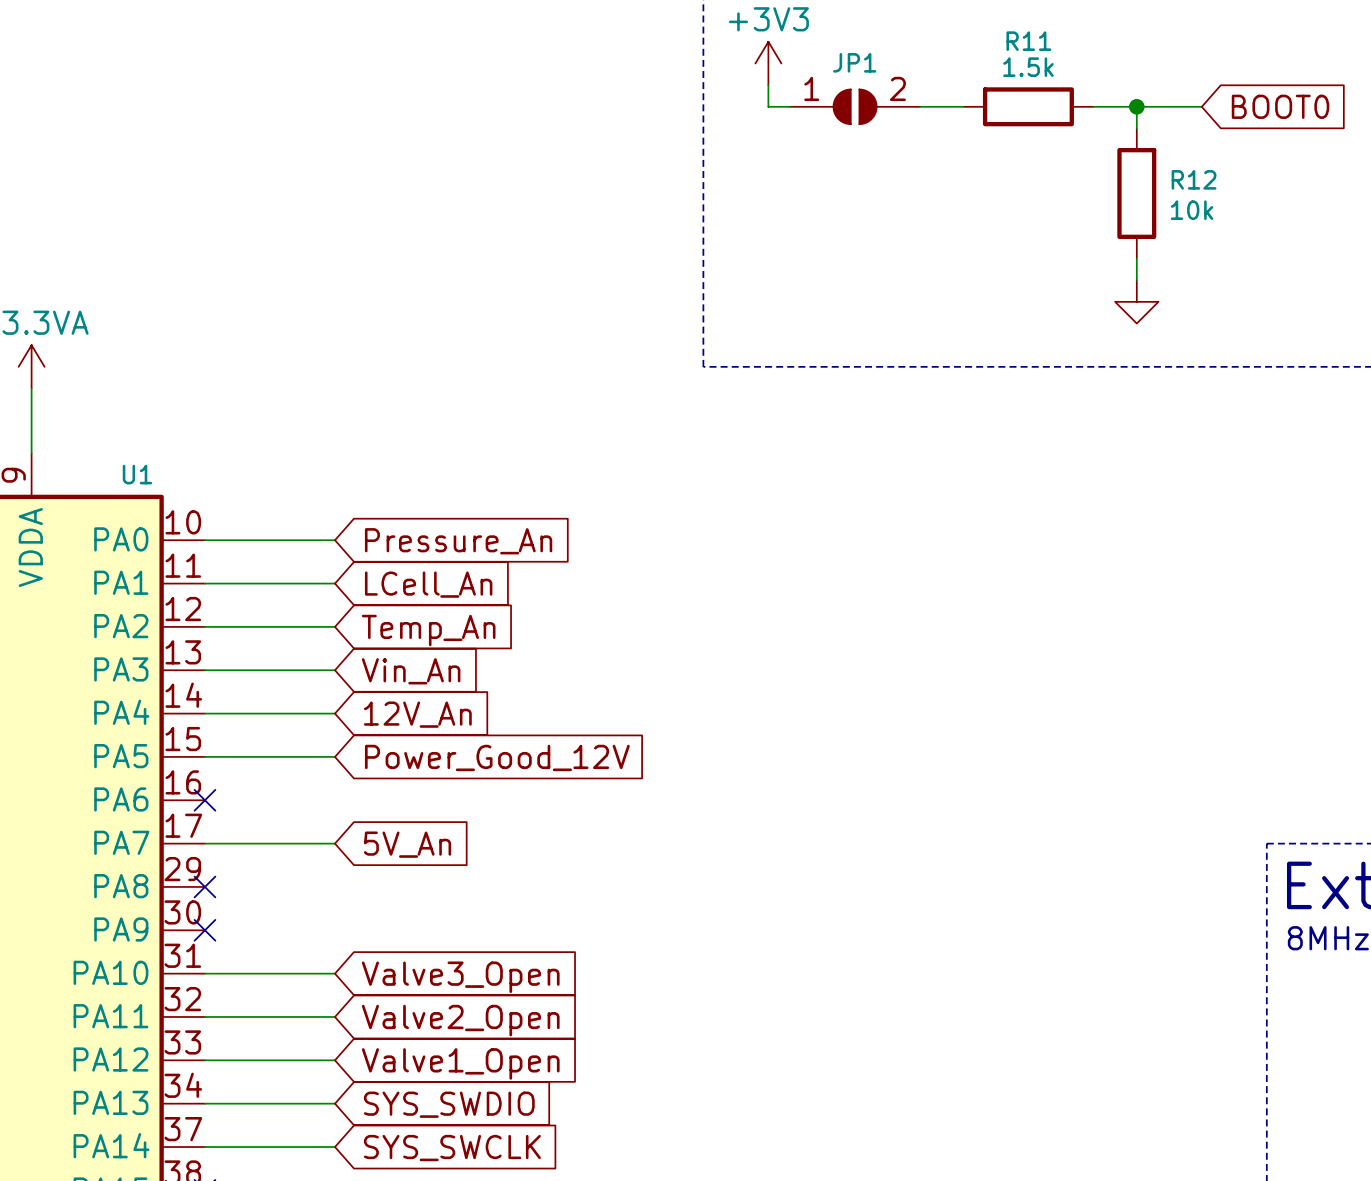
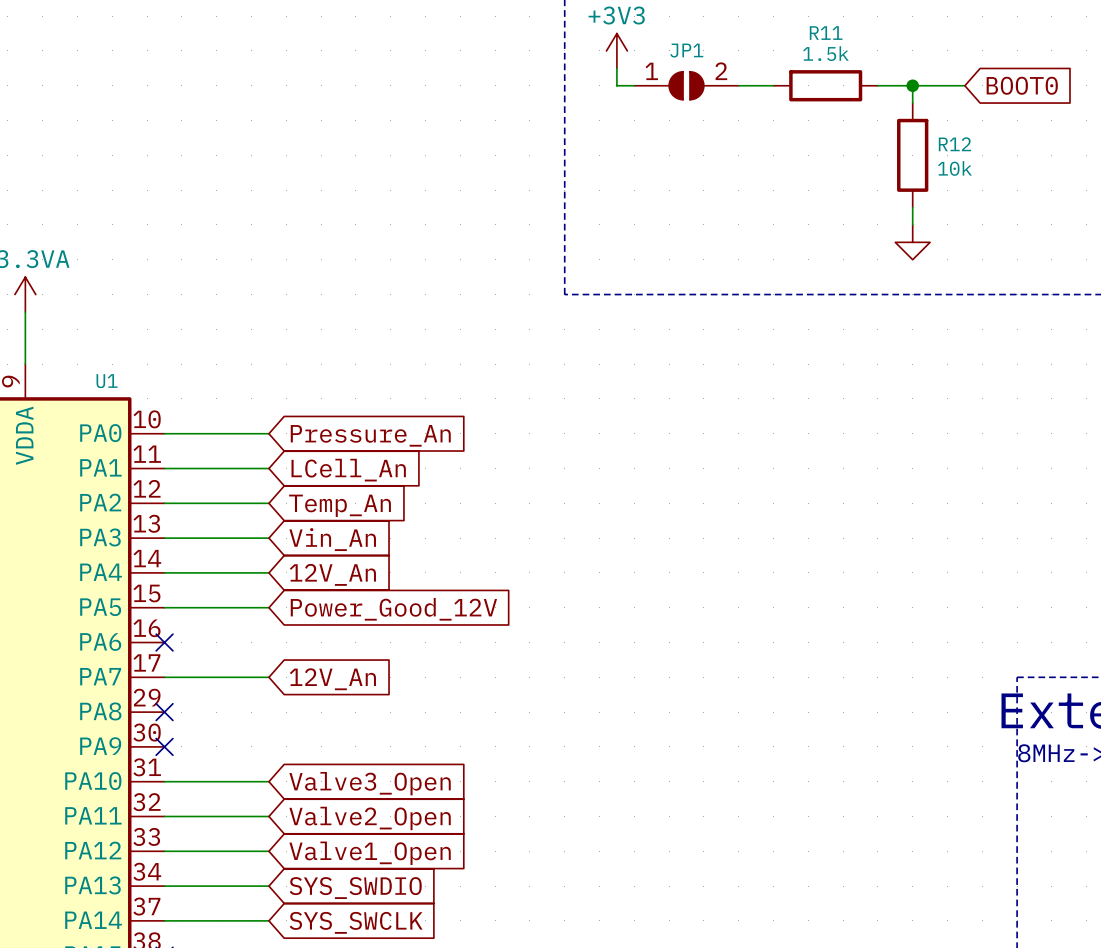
global label: 5V_An (407, 844) -> 12V_An (332, 679)

